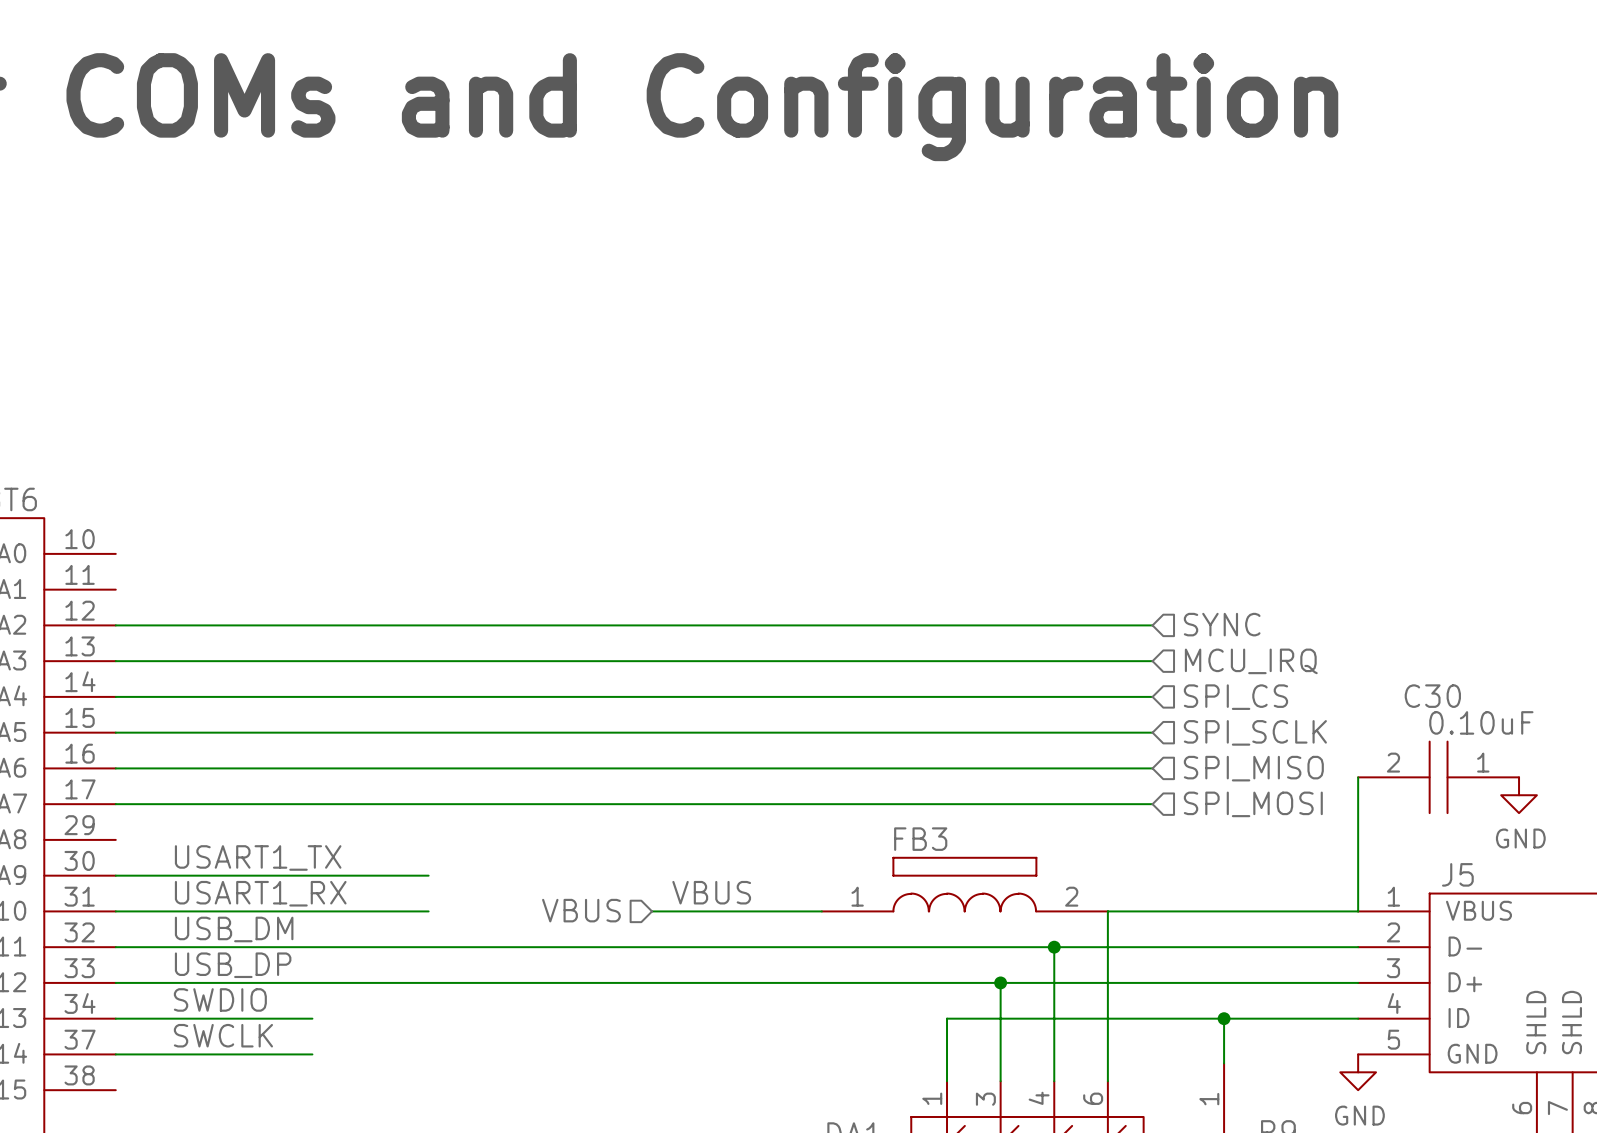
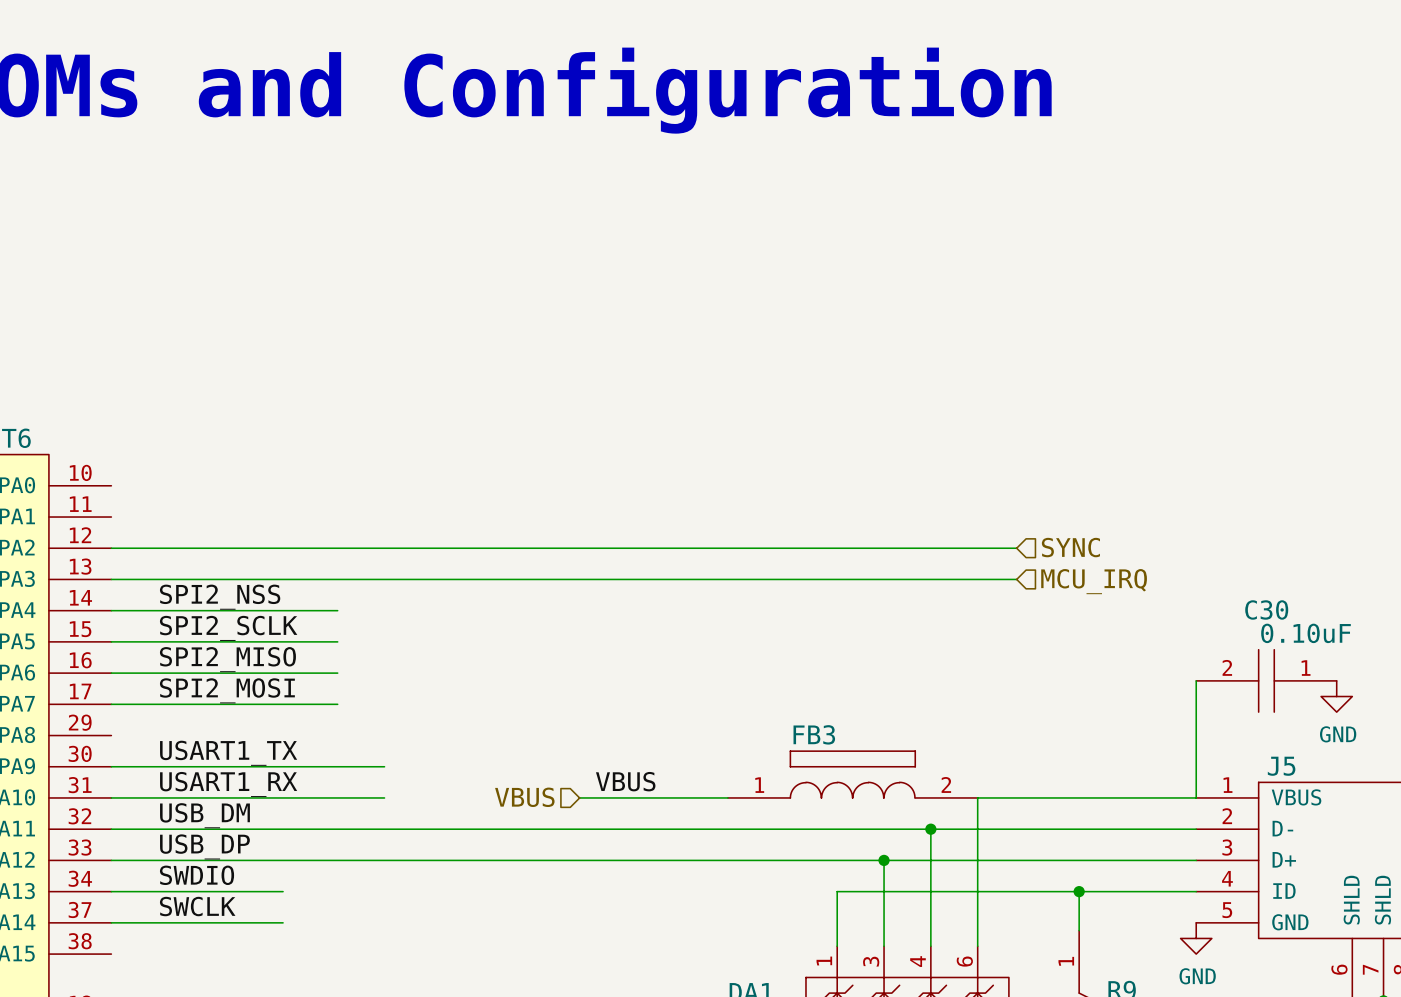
label: none -> SPI2_NSS (220, 597)
wire: (374, 696) (1152, 696) -> none
hierarchical label: SPI_CS (1235, 697) -> none
label: none -> SPI2_SCLK (228, 628)
wire: (374, 732) (1152, 732) -> none
hierarchical label: SPI_SCLK (1255, 732) -> none
label: none -> SPI2_MISO (227, 659)
wire: (374, 768) (1152, 768) -> none
hierarchical label: SPI_MISO (1253, 768) -> none
label: none -> SPI2_MOSI (227, 690)
wire: (374, 804) (1152, 804) -> none
hierarchical label: SPI_MOSI (1253, 804) -> none

